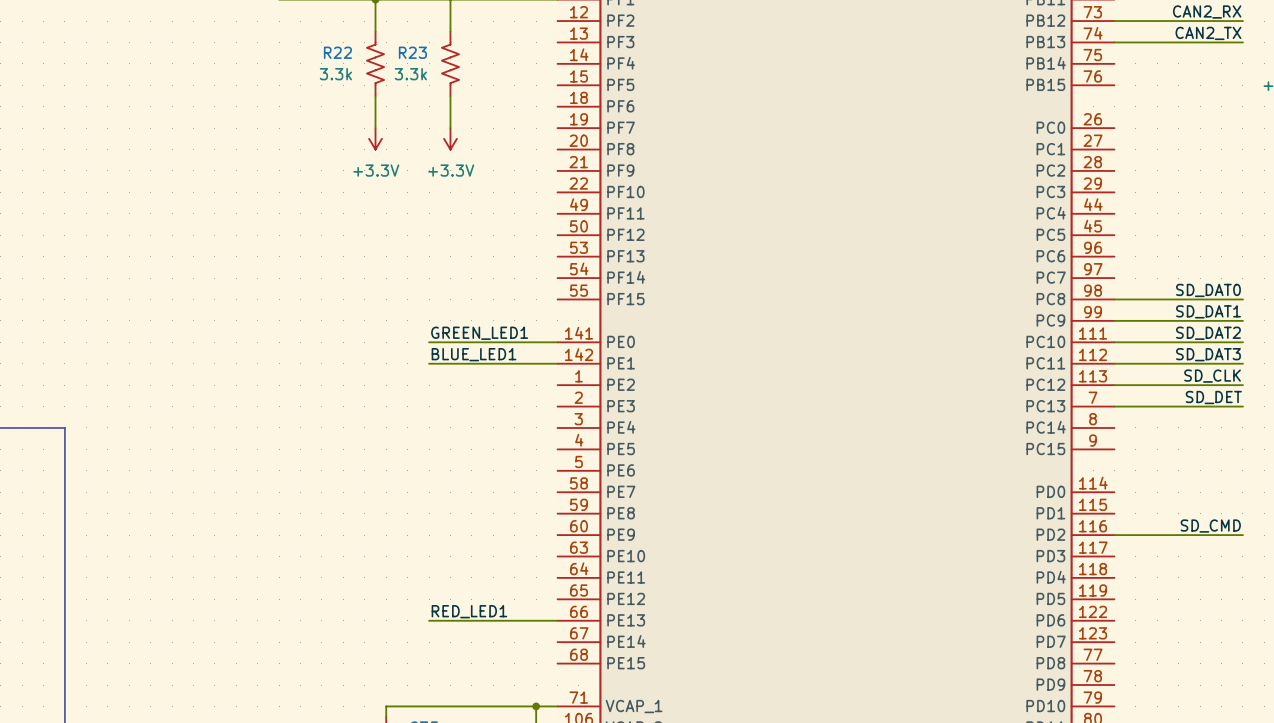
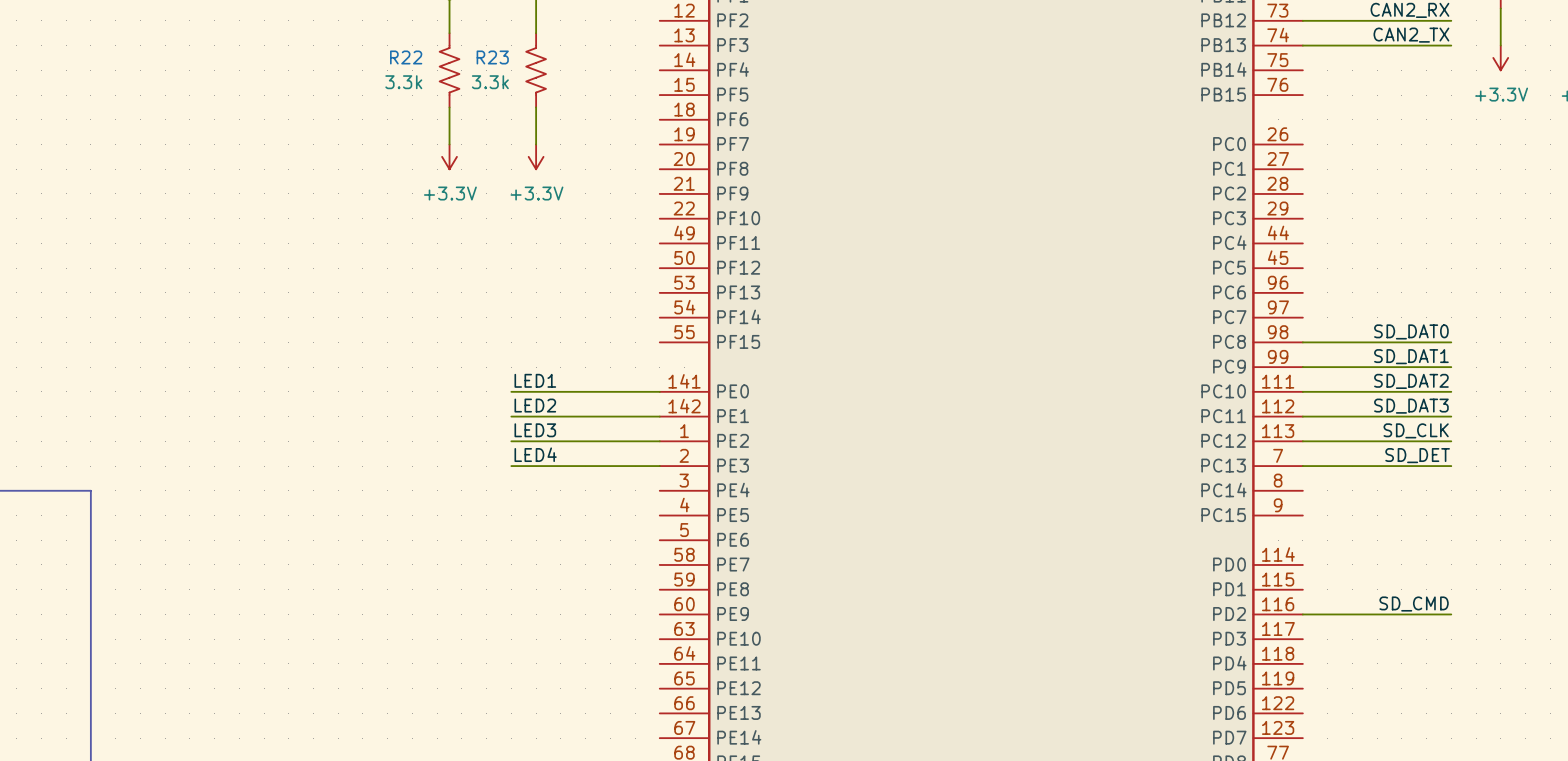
label: GREEN_LED1 (479, 333) -> LED1 (535, 380)
label: BLUE_LED1 (474, 354) -> LED2 (535, 405)
label: none -> LED3 (535, 430)
wire: none -> (511, 441) (659, 441)
label: none -> LED4 (535, 454)
wire: none -> (511, 466) (659, 466)
label: RED_LED1 (469, 611) -> none
wire: (429, 620) (557, 620) -> none

